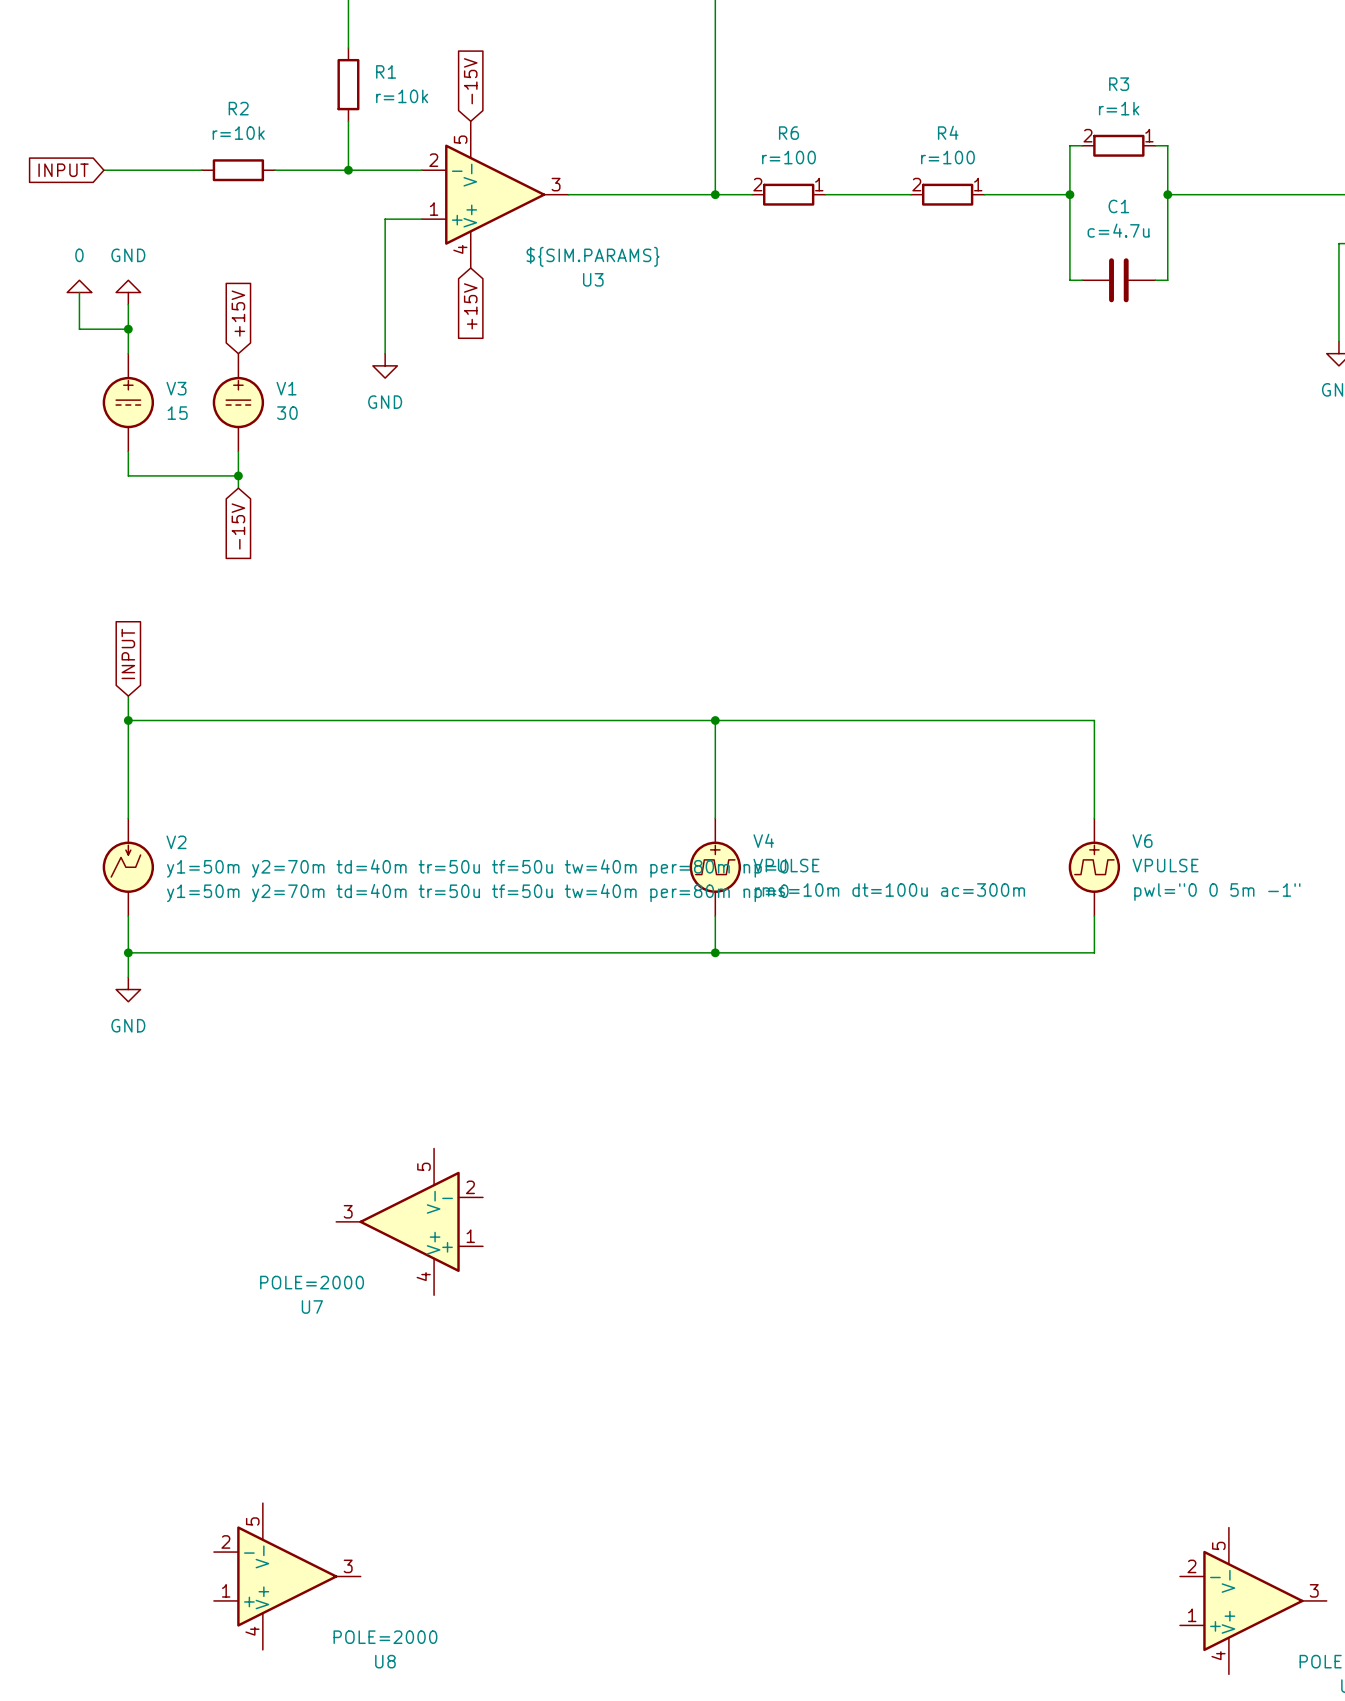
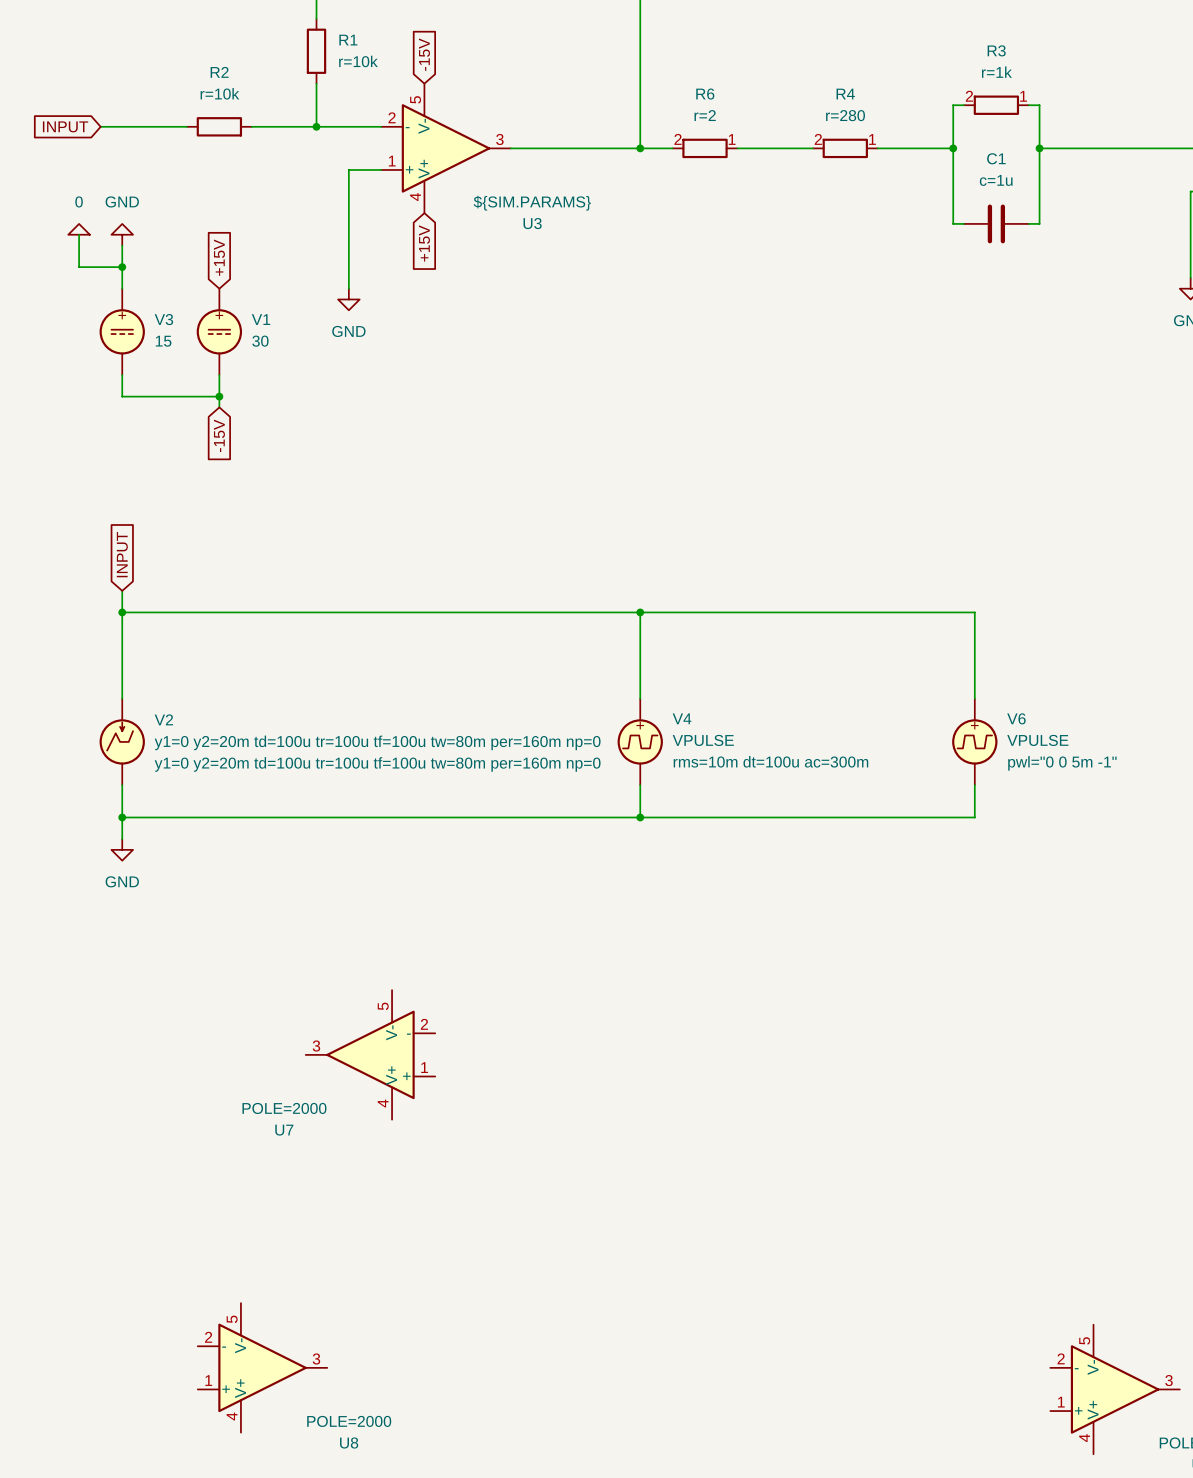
R6 value: r=100 (788, 157) -> r=2 (705, 115)
R4 value: r=100 (947, 157) -> r=280 (845, 115)
C1 value: c=4.7u (1118, 230) -> c=1u (996, 180)
V2 value: y1=50m y2=70m td=40m tr=50u tf=50u tw=40m per=80m np=0 (477, 868) -> y1=0 y2=20m td=100u tr=100u tf=100u tw=80m per=160m np=0 (377, 742)
V2 text: y1=50m y2=70m td=40m tr=50u tf=50u tw=40m per=80m np=0 (477, 892) -> y1=0 y2=20m td=100u tr=100u tf=100u tw=80m per=160m np=0 (377, 764)

